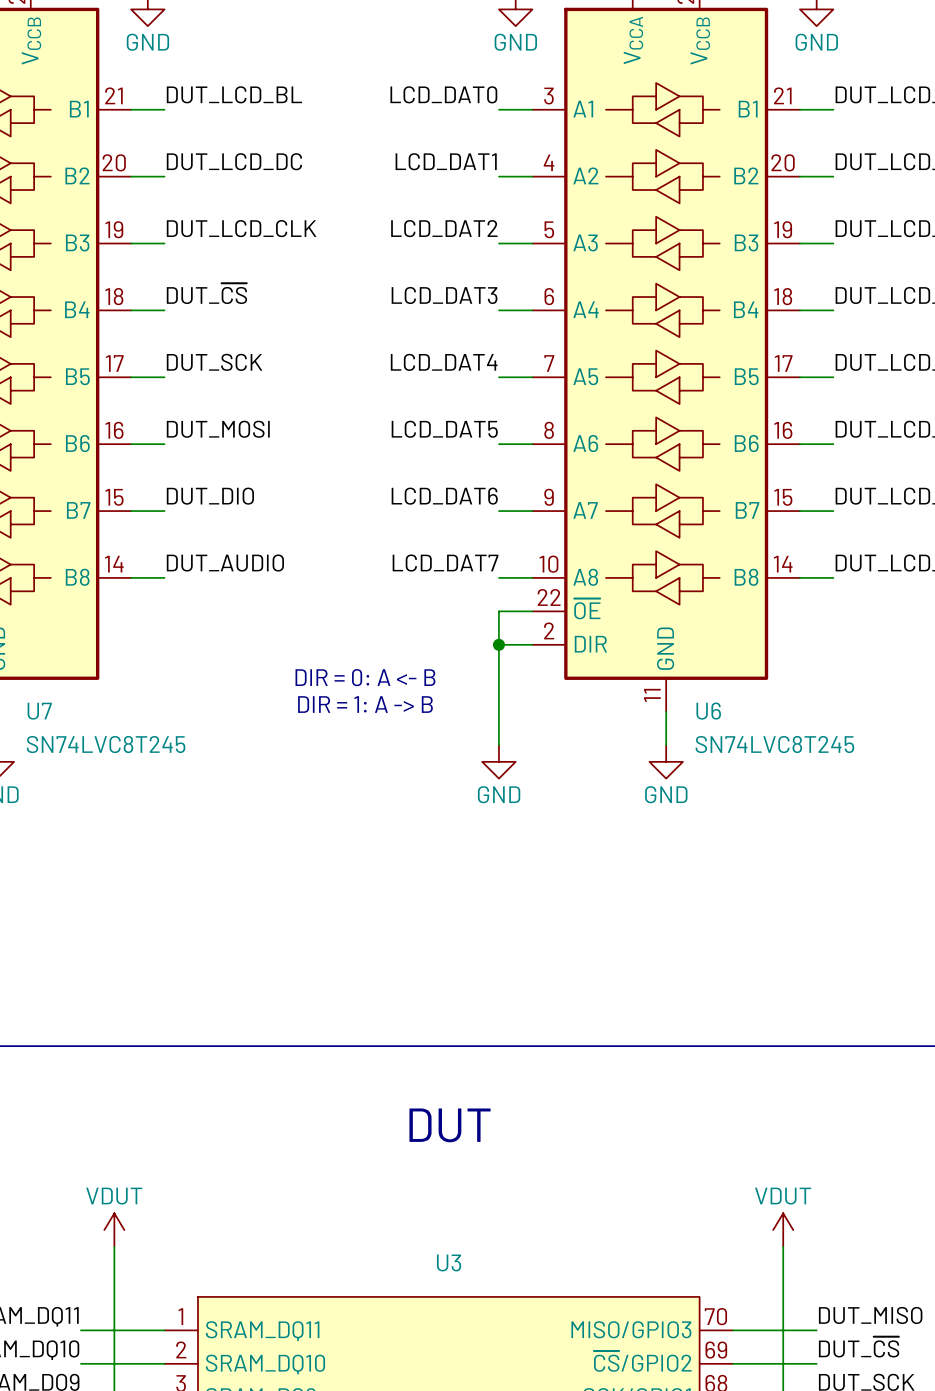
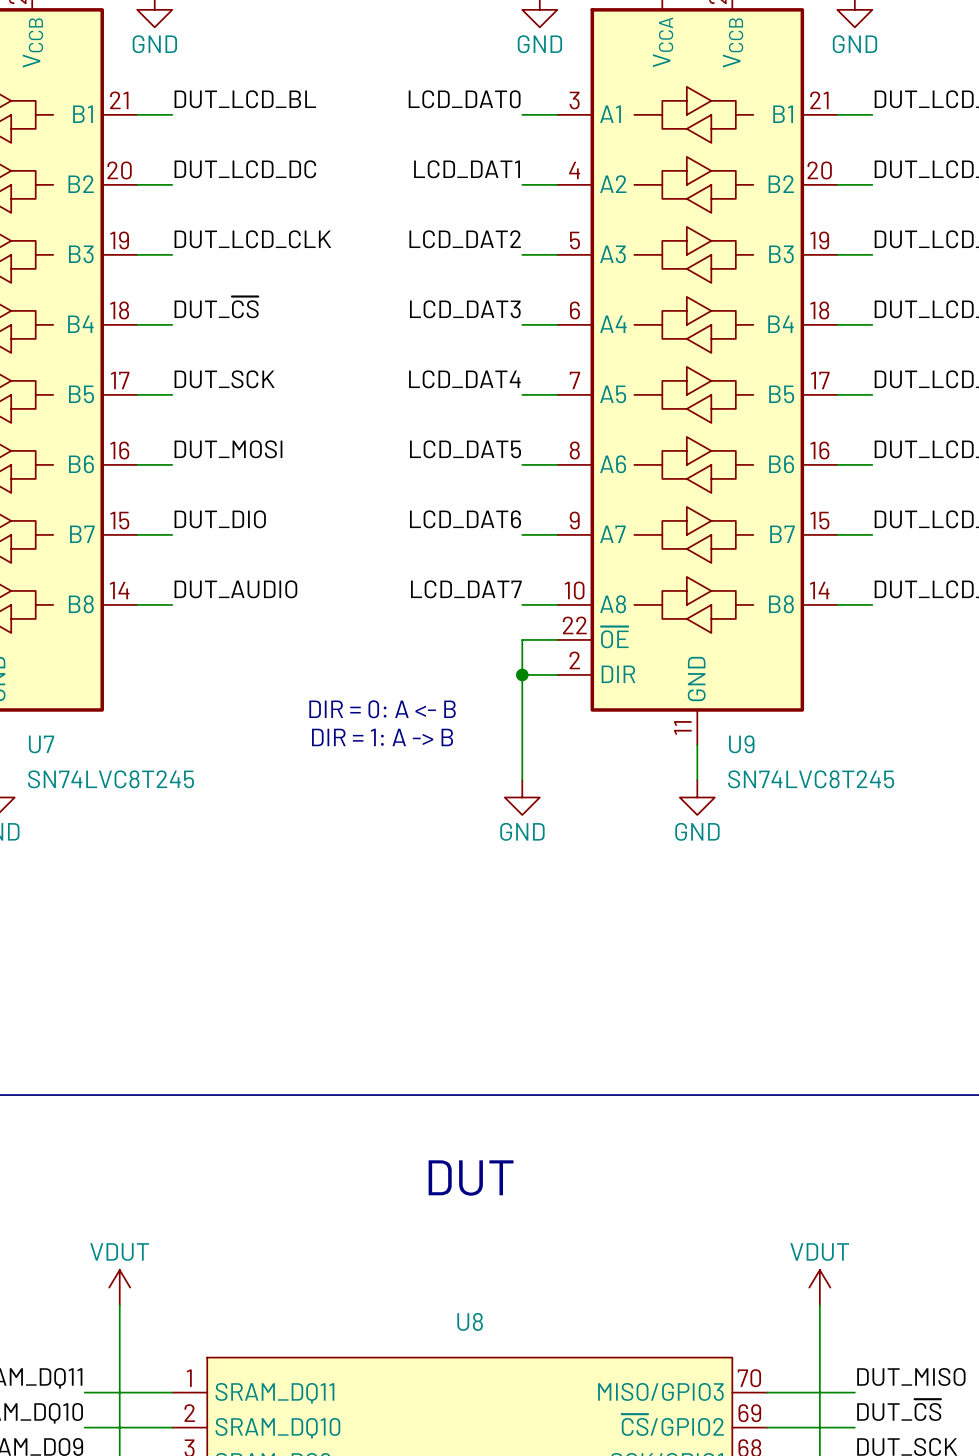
U6 name: U6 (708, 711) -> U9 (741, 744)
U3 name: U3 (449, 1262) -> U8 (470, 1321)

